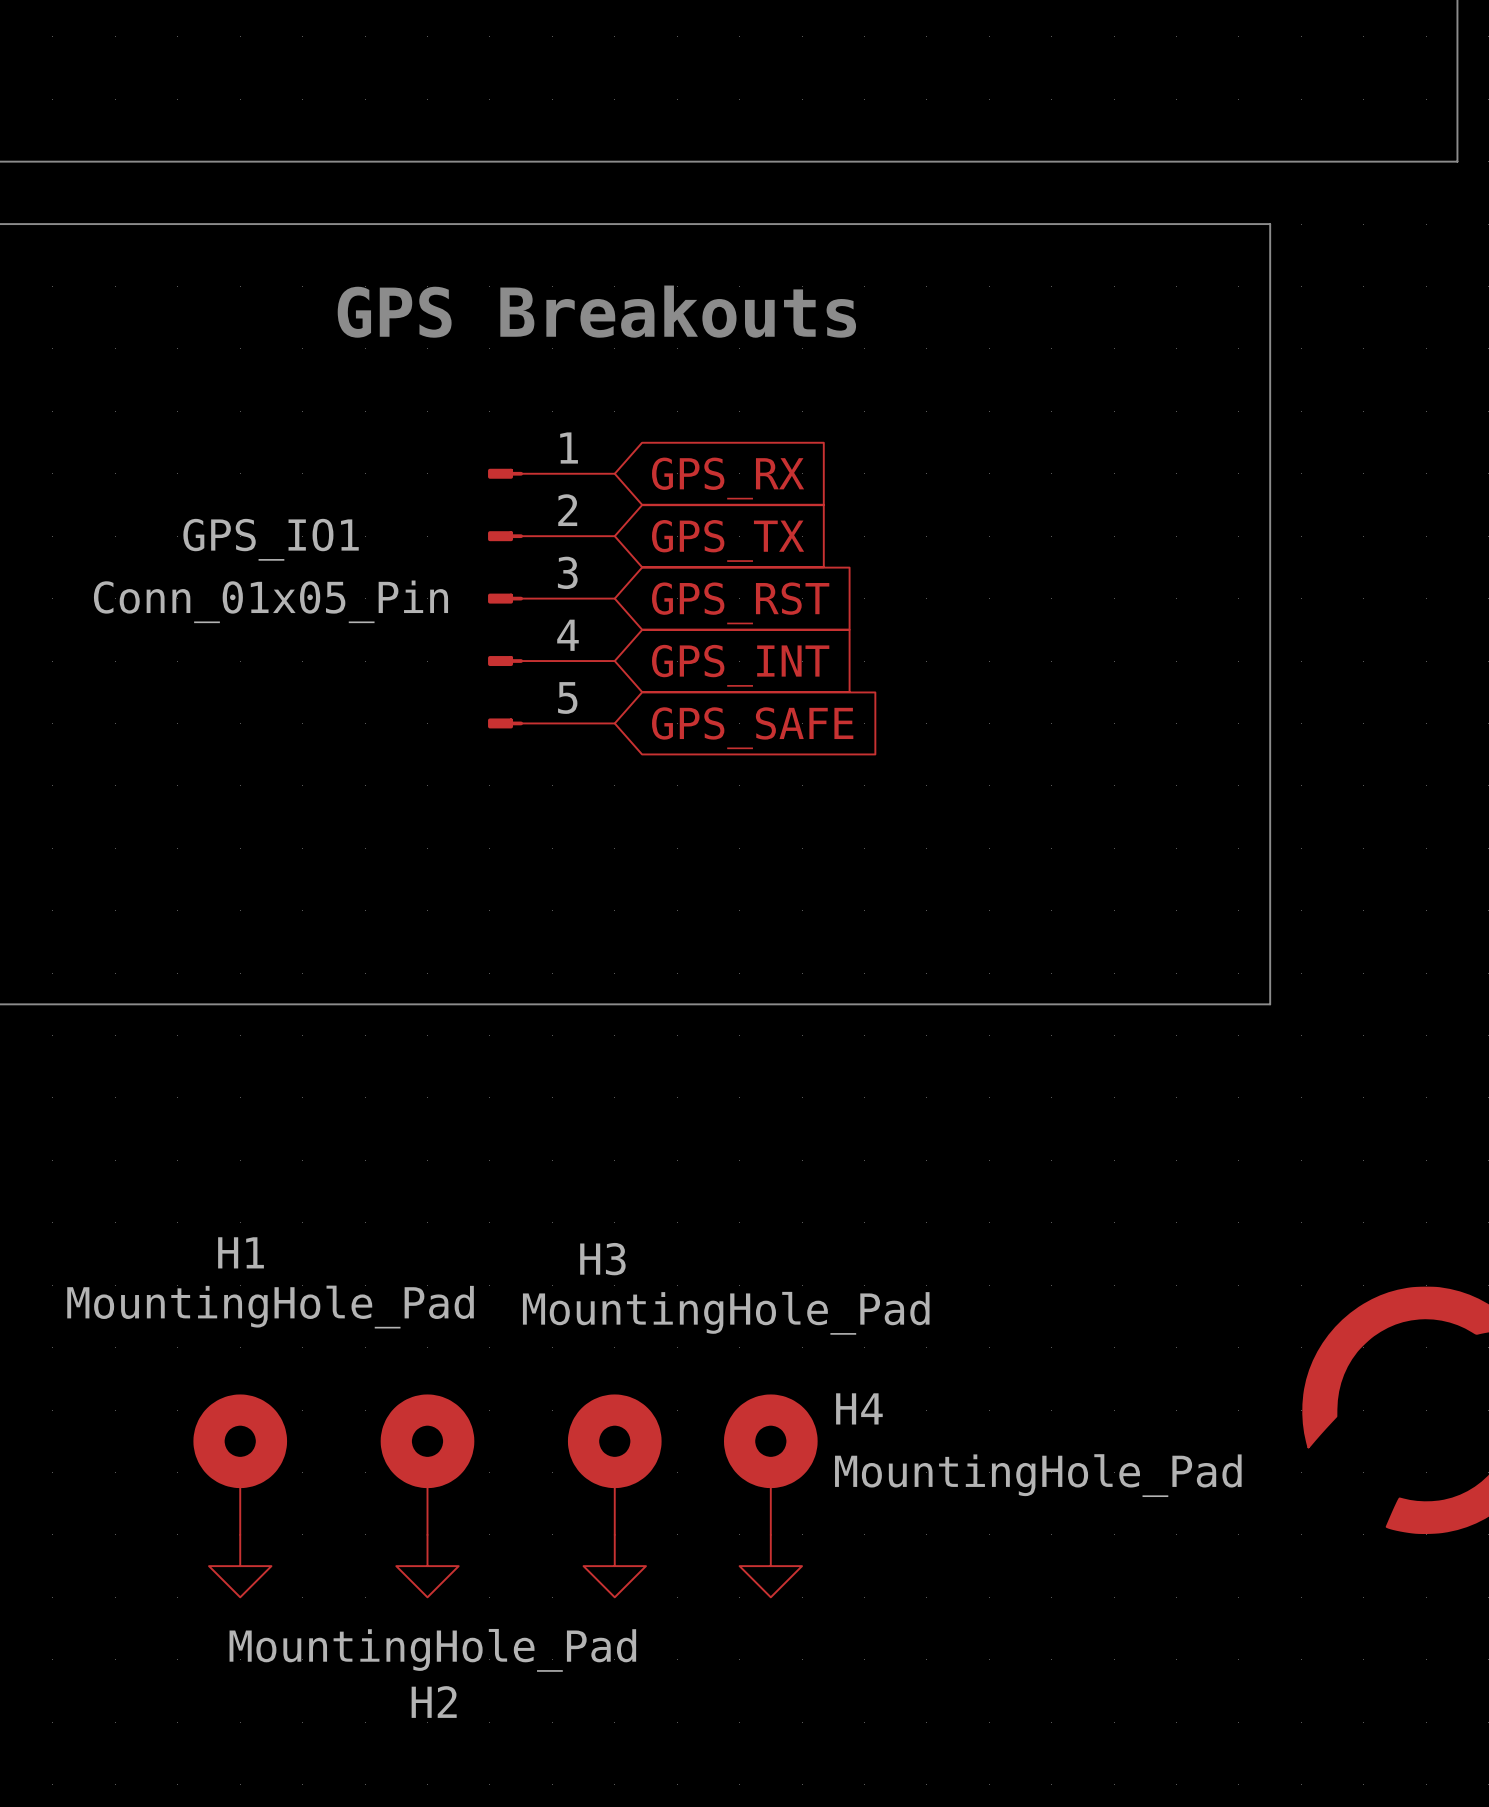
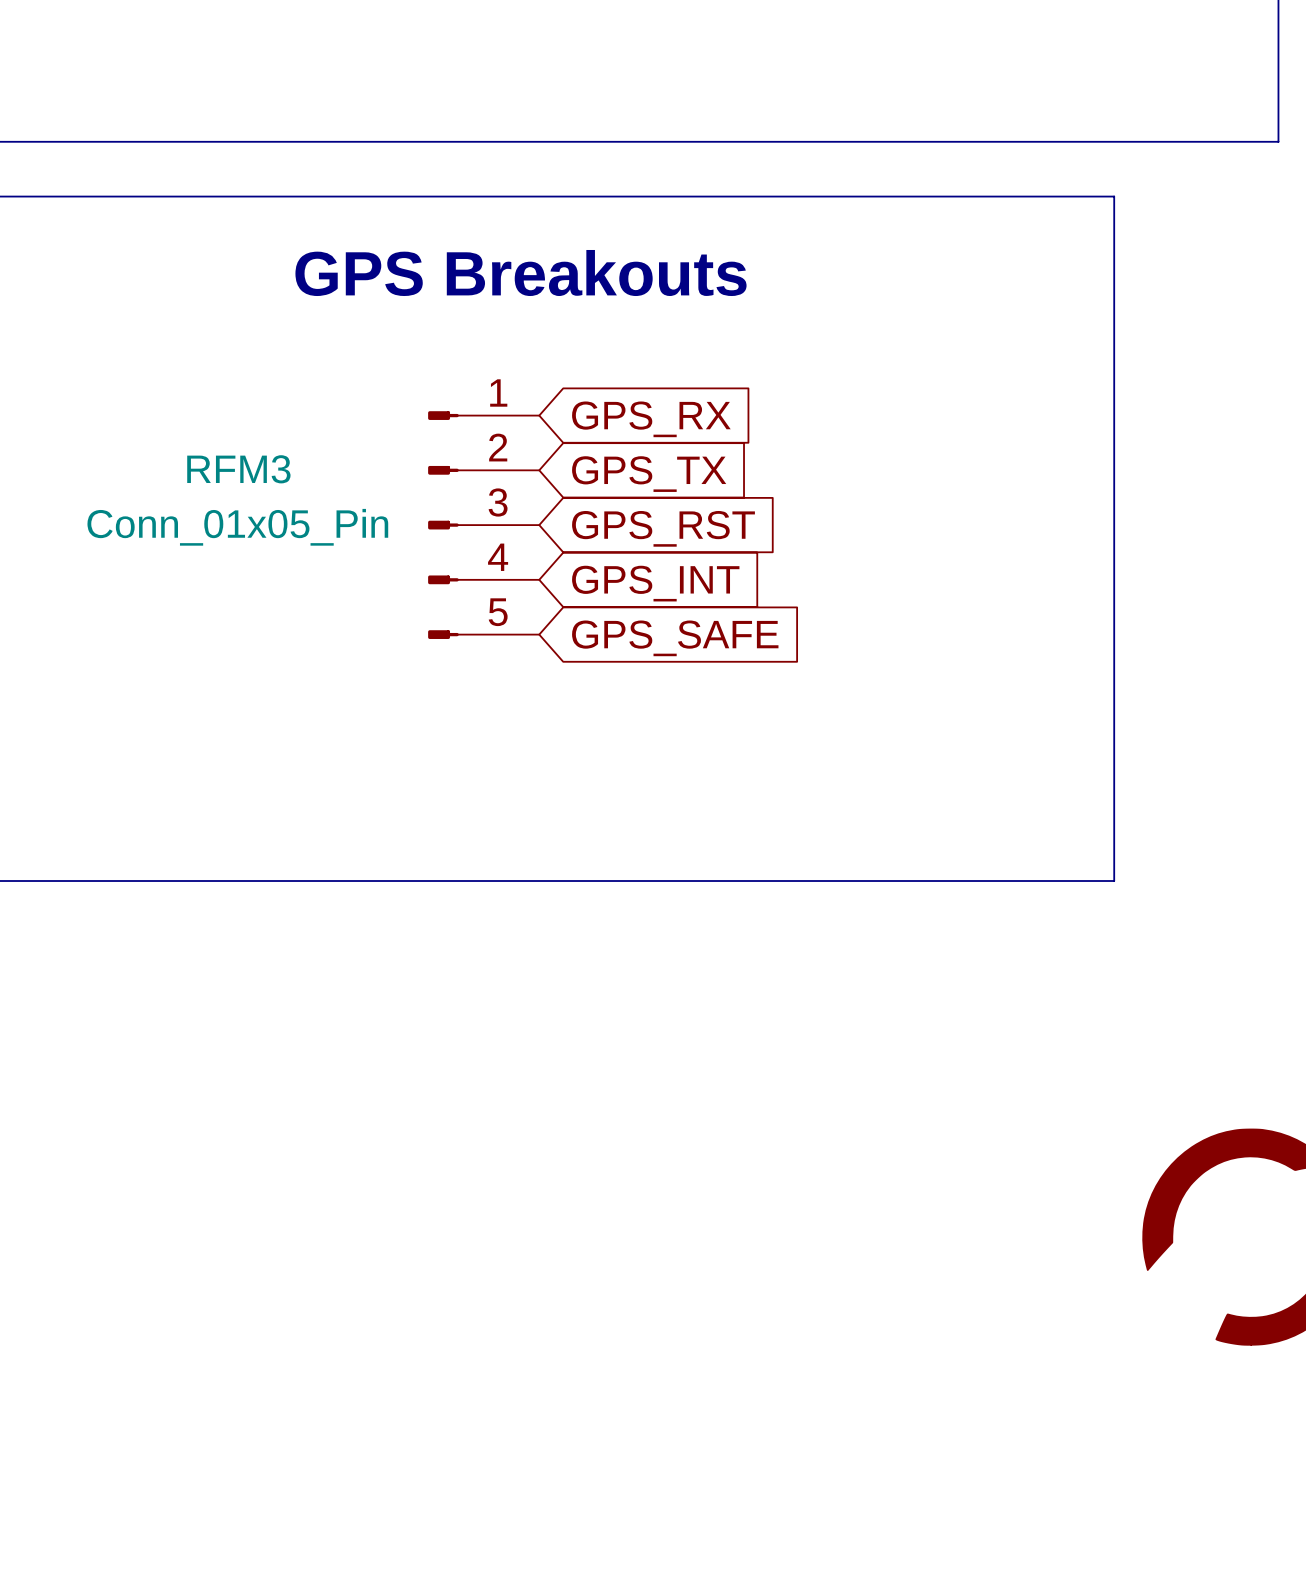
GPS_IO1 name: GPS_IO1 (271, 539) -> RFM3 (238, 469)
H1: MountingHole_Pad (240, 1464) -> none
H2: MountingHole_Pad (427, 1464) -> none
H3: MountingHole_Pad (614, 1464) -> none
H4: MountingHole_Pad (770, 1464) -> none
power symbol: (240, 1566) -> none
power symbol: (427, 1566) -> none
power symbol: (614, 1566) -> none
power symbol: (770, 1566) -> none

